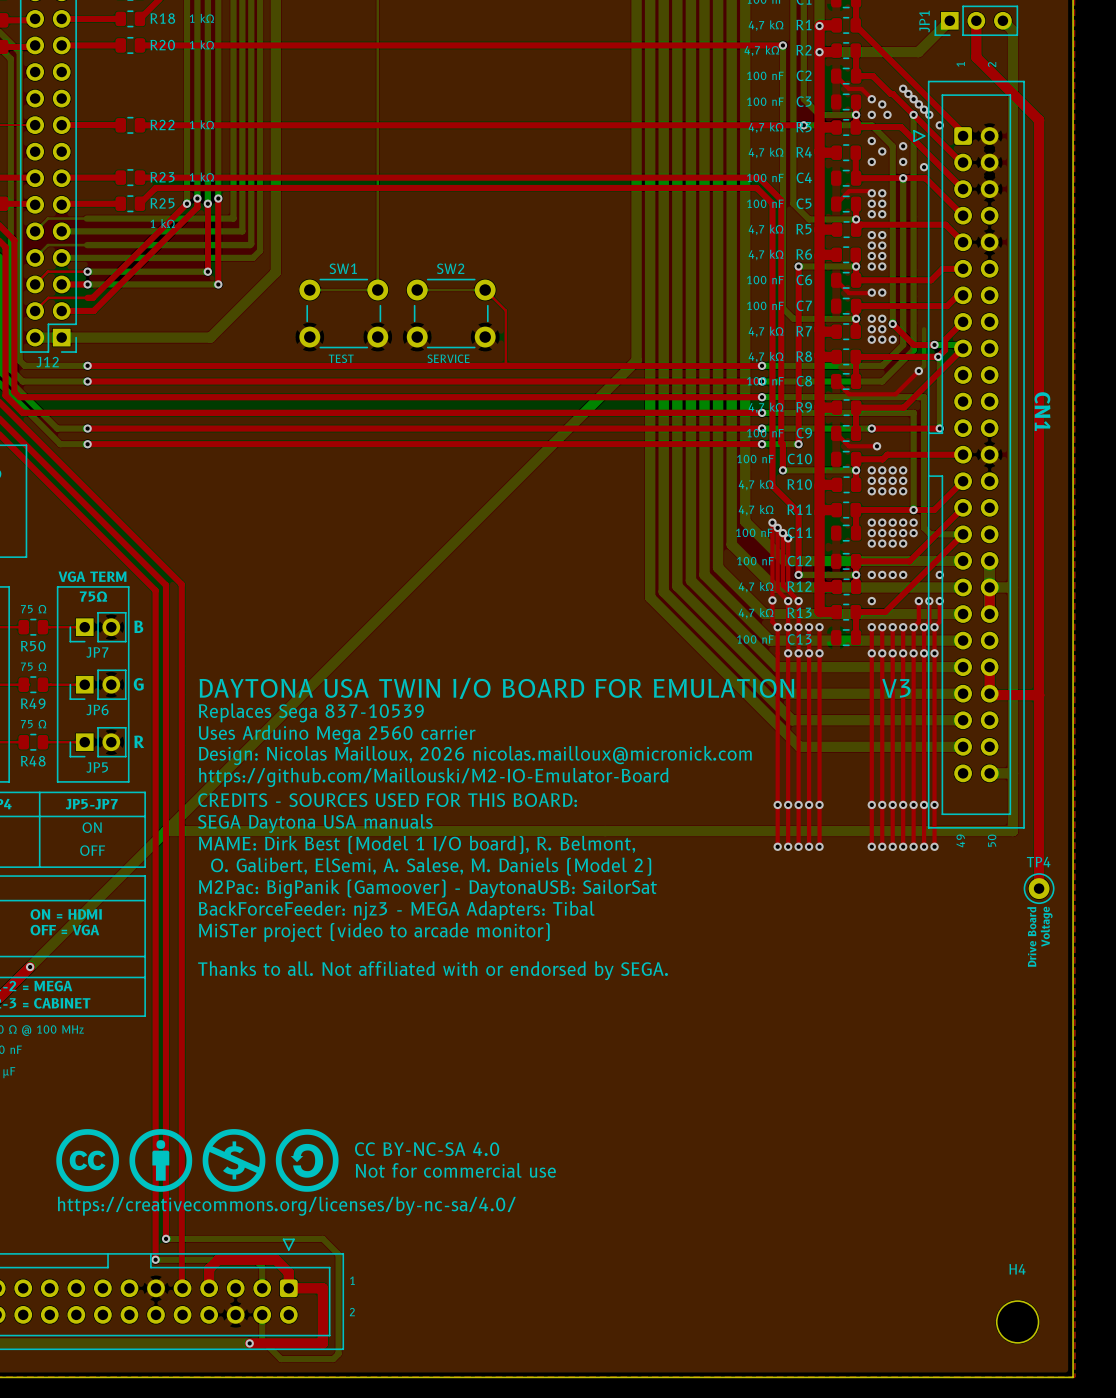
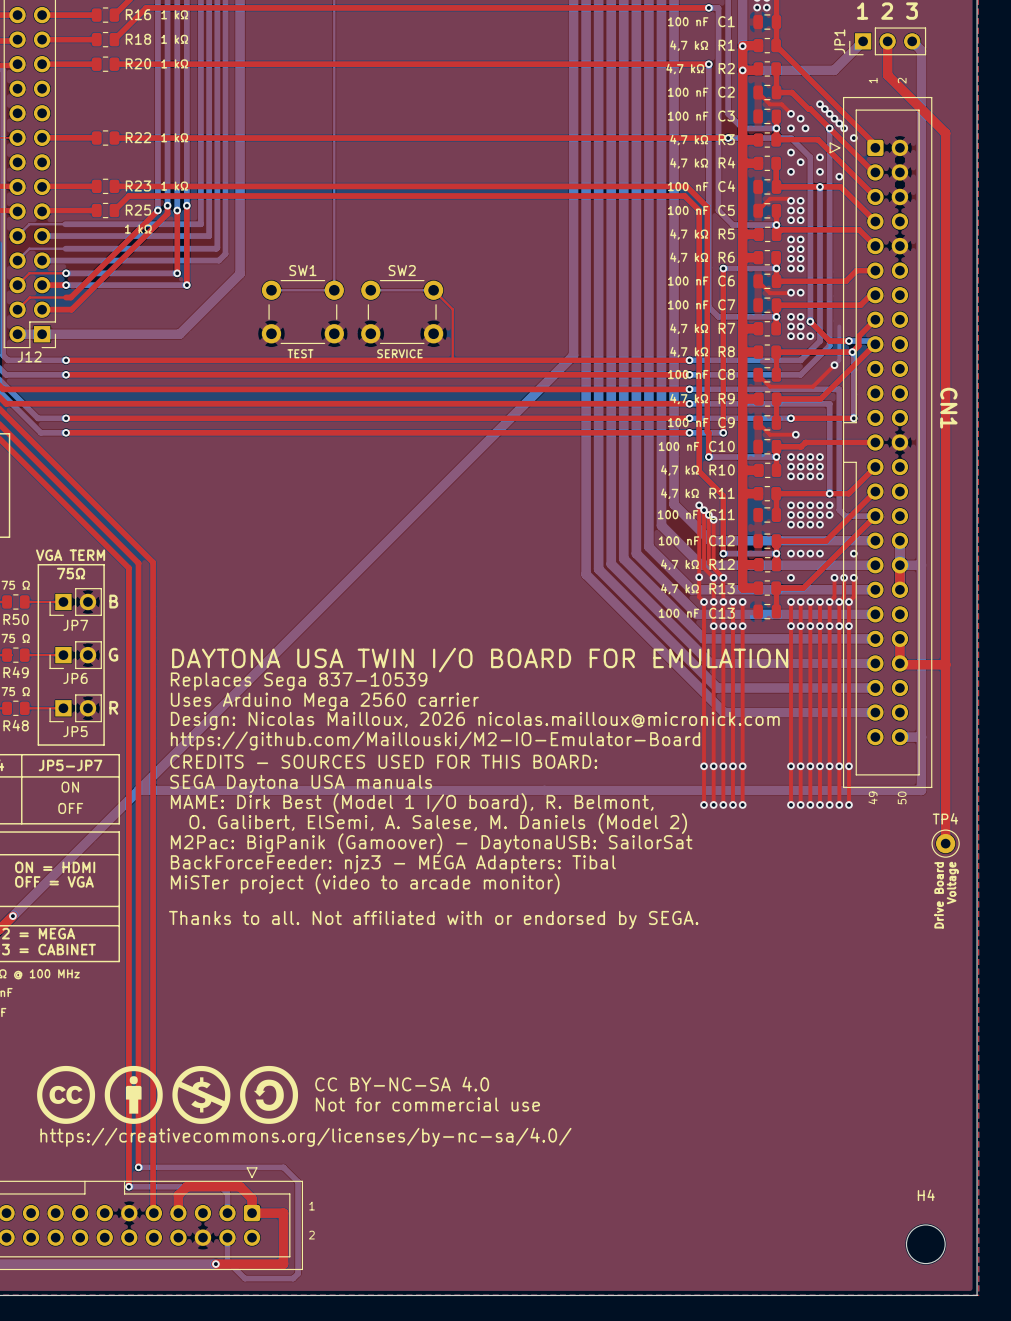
text: V3 (896, 688) -> none

